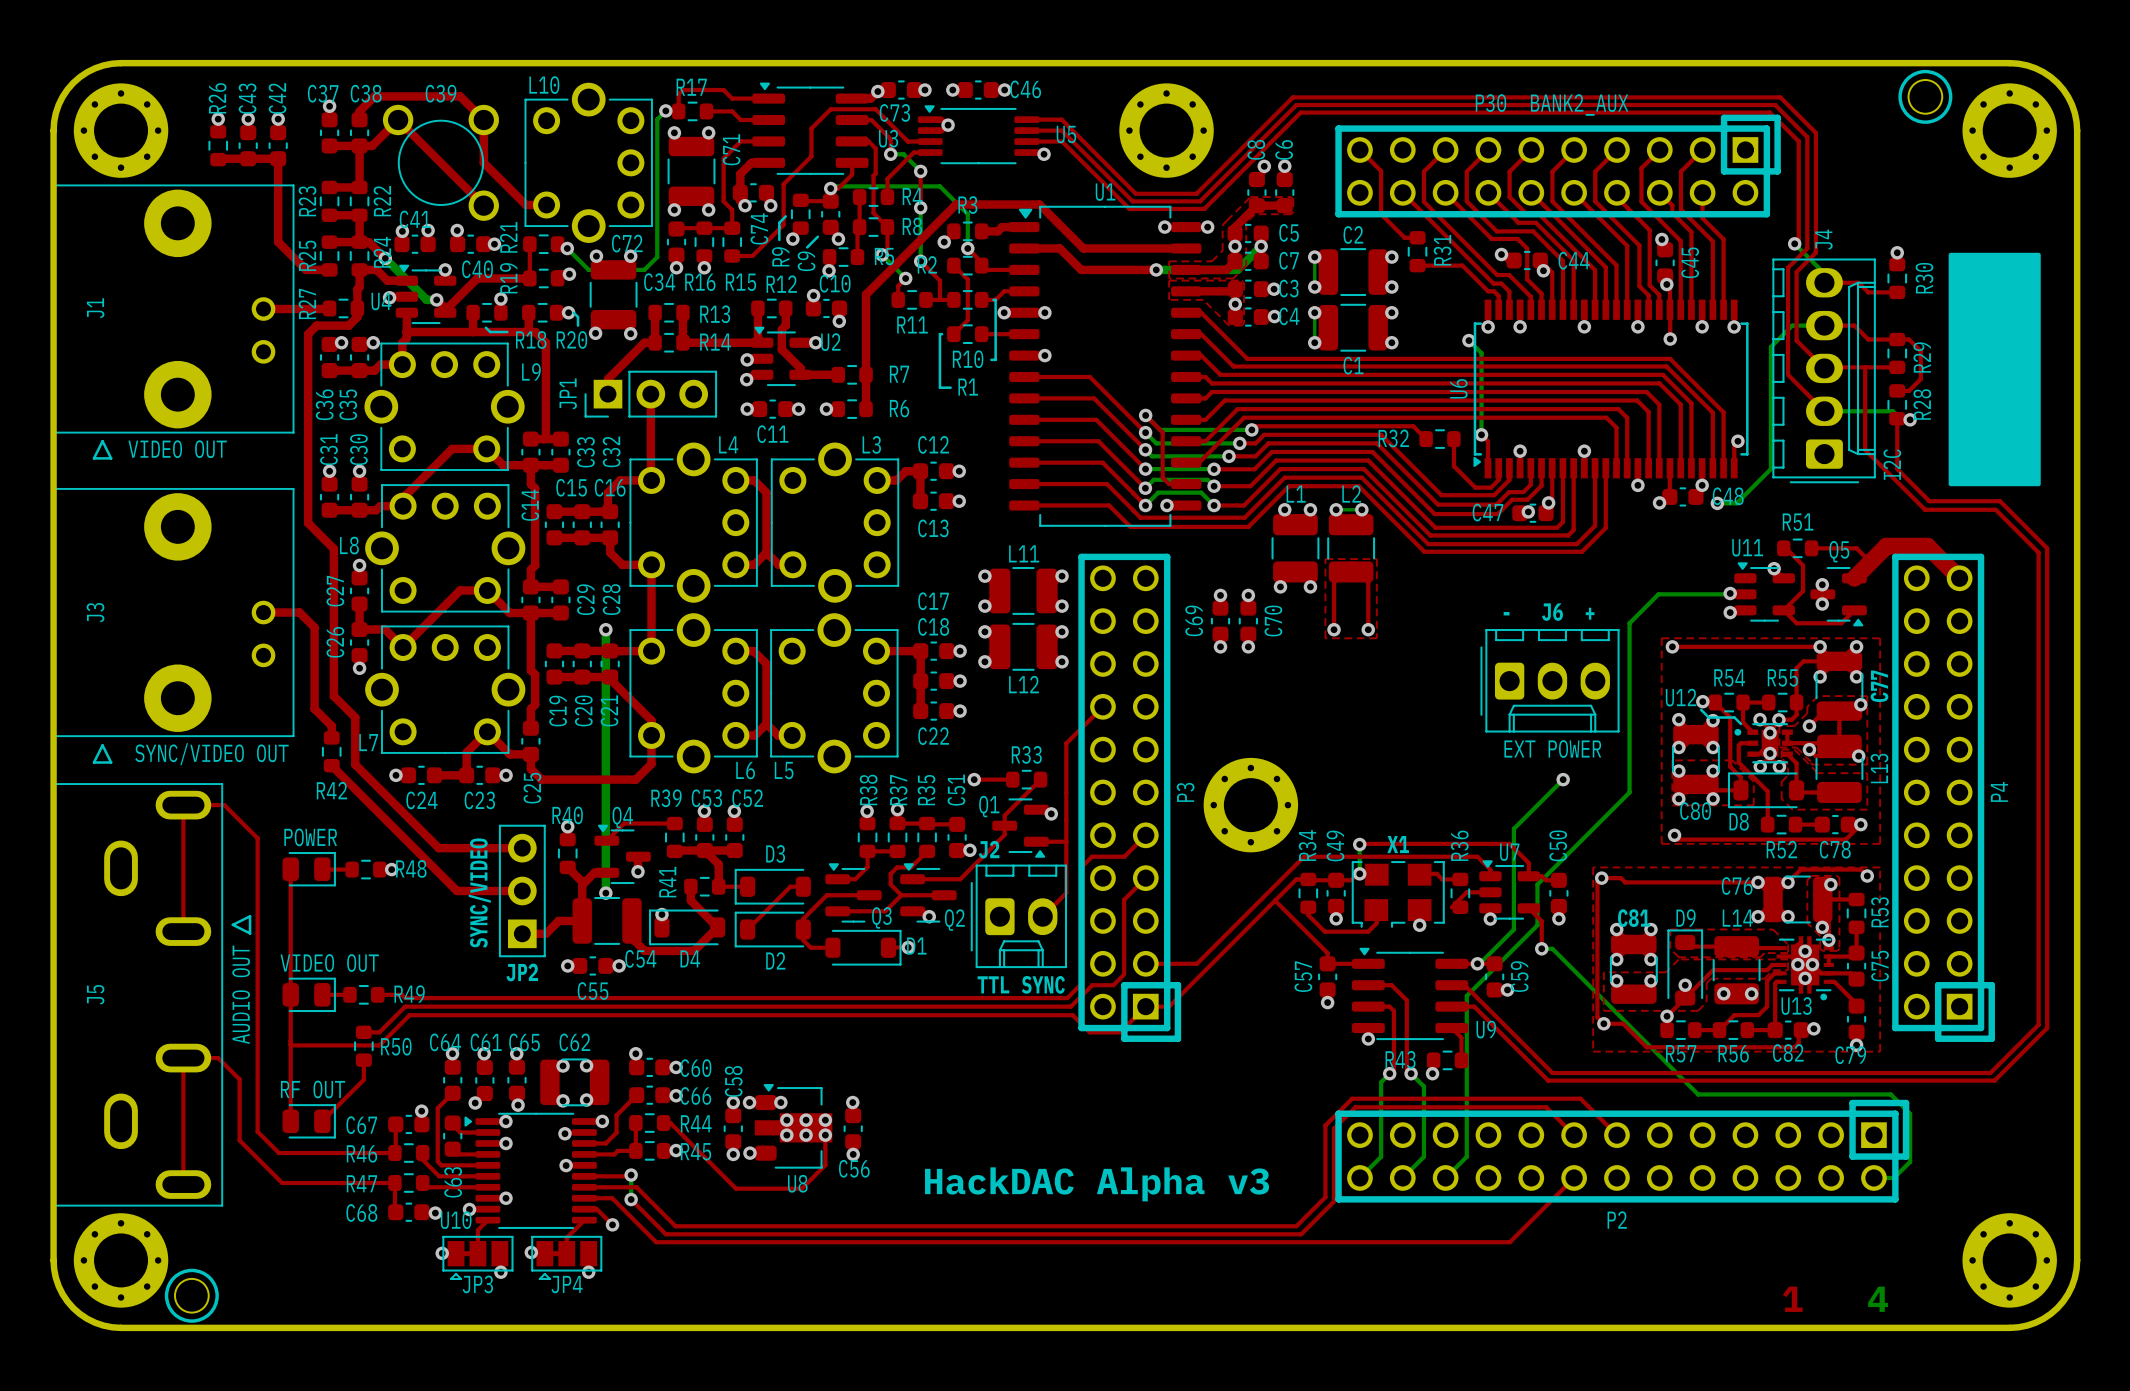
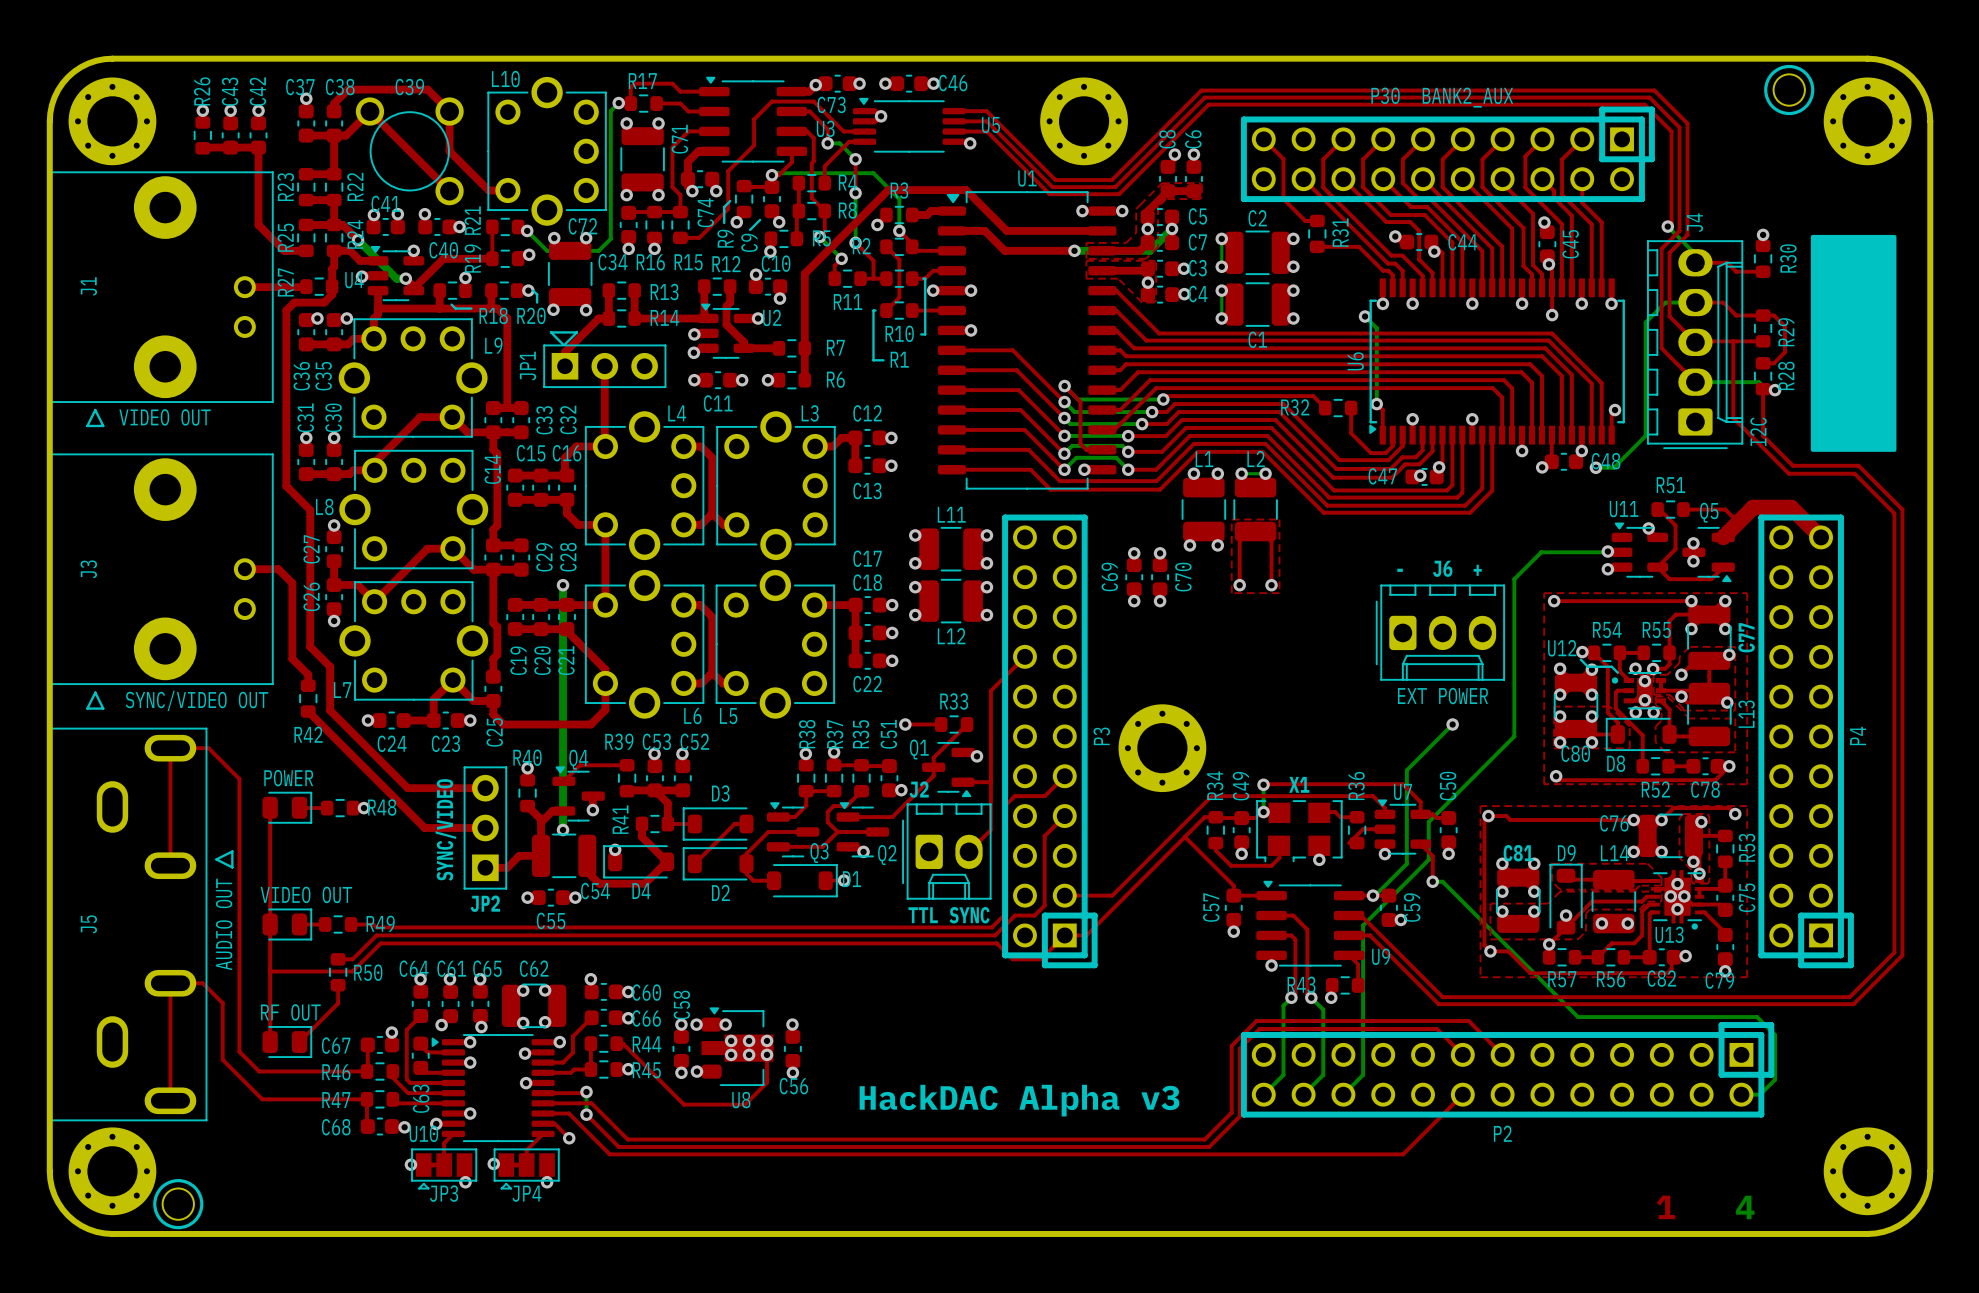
JP1 footprint: [584, 370, 718, 418] -> [543, 344, 667, 389]
line: none -> (563, 344) (551, 332) (576, 332) (565, 344)

